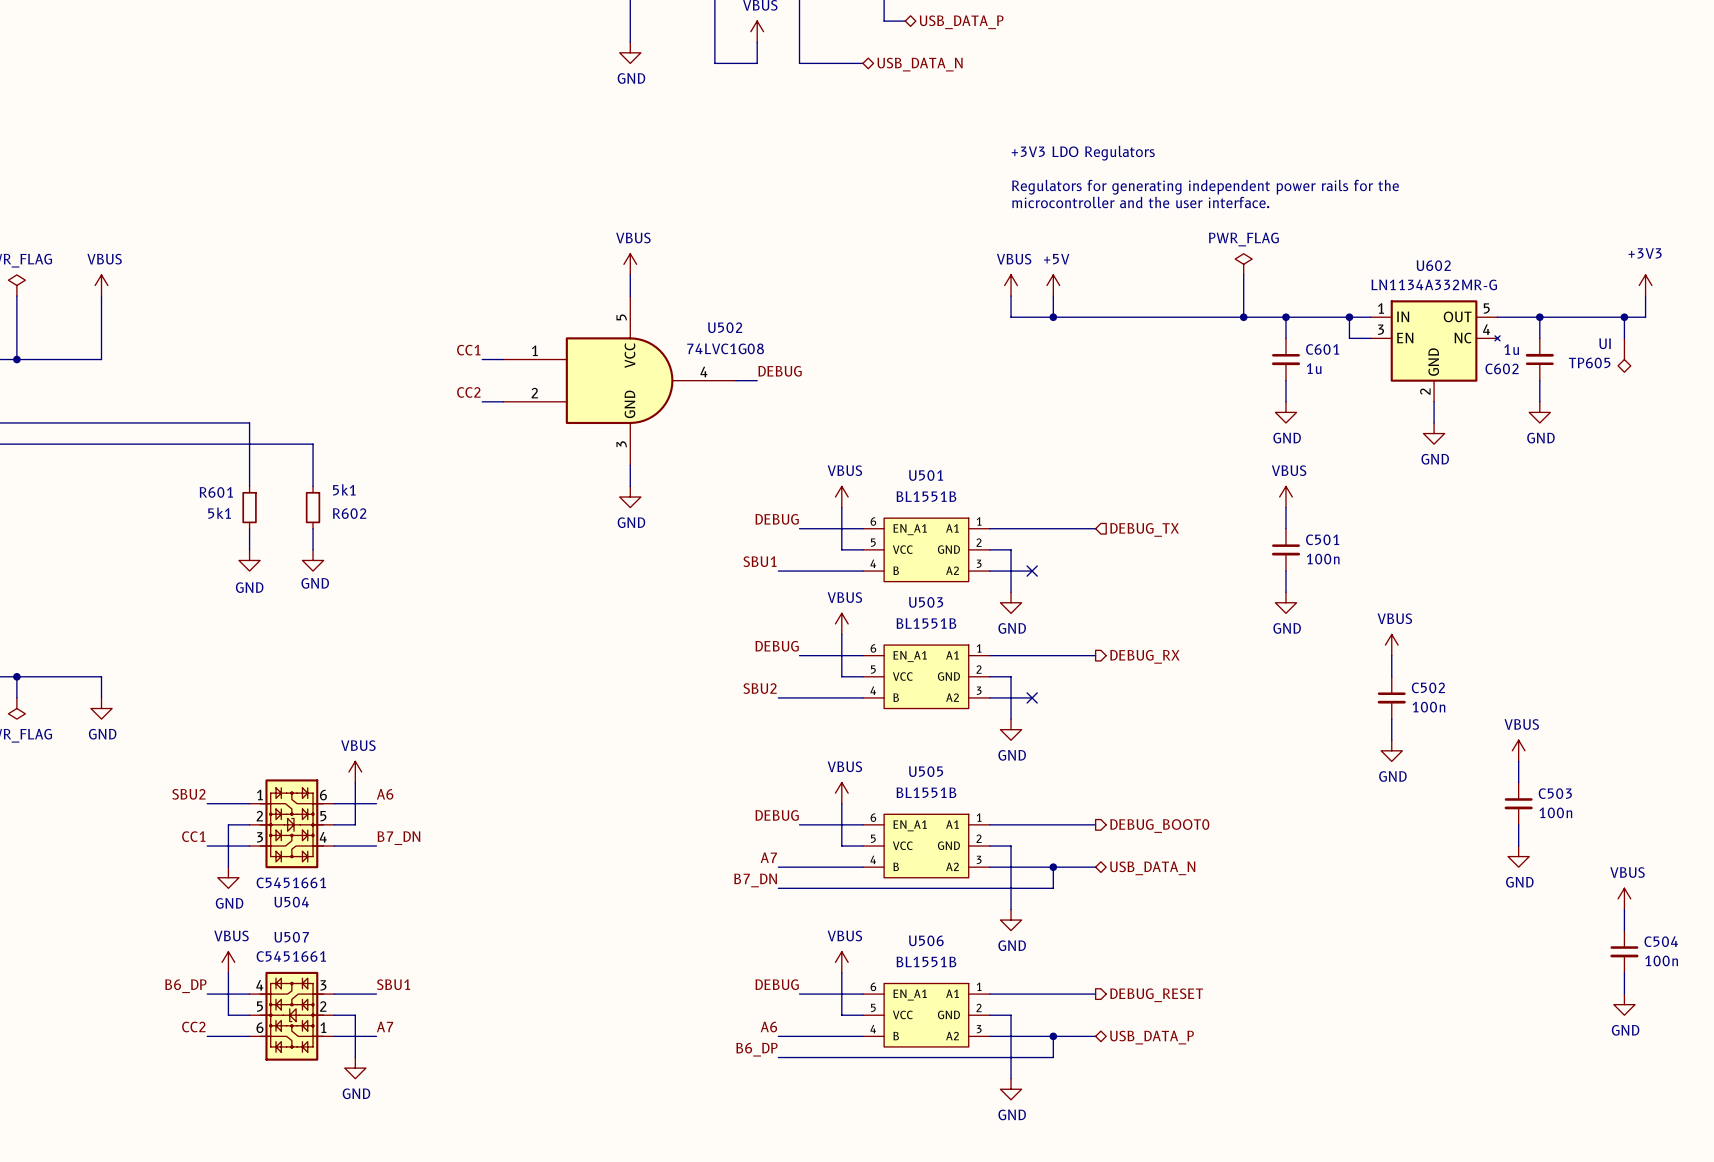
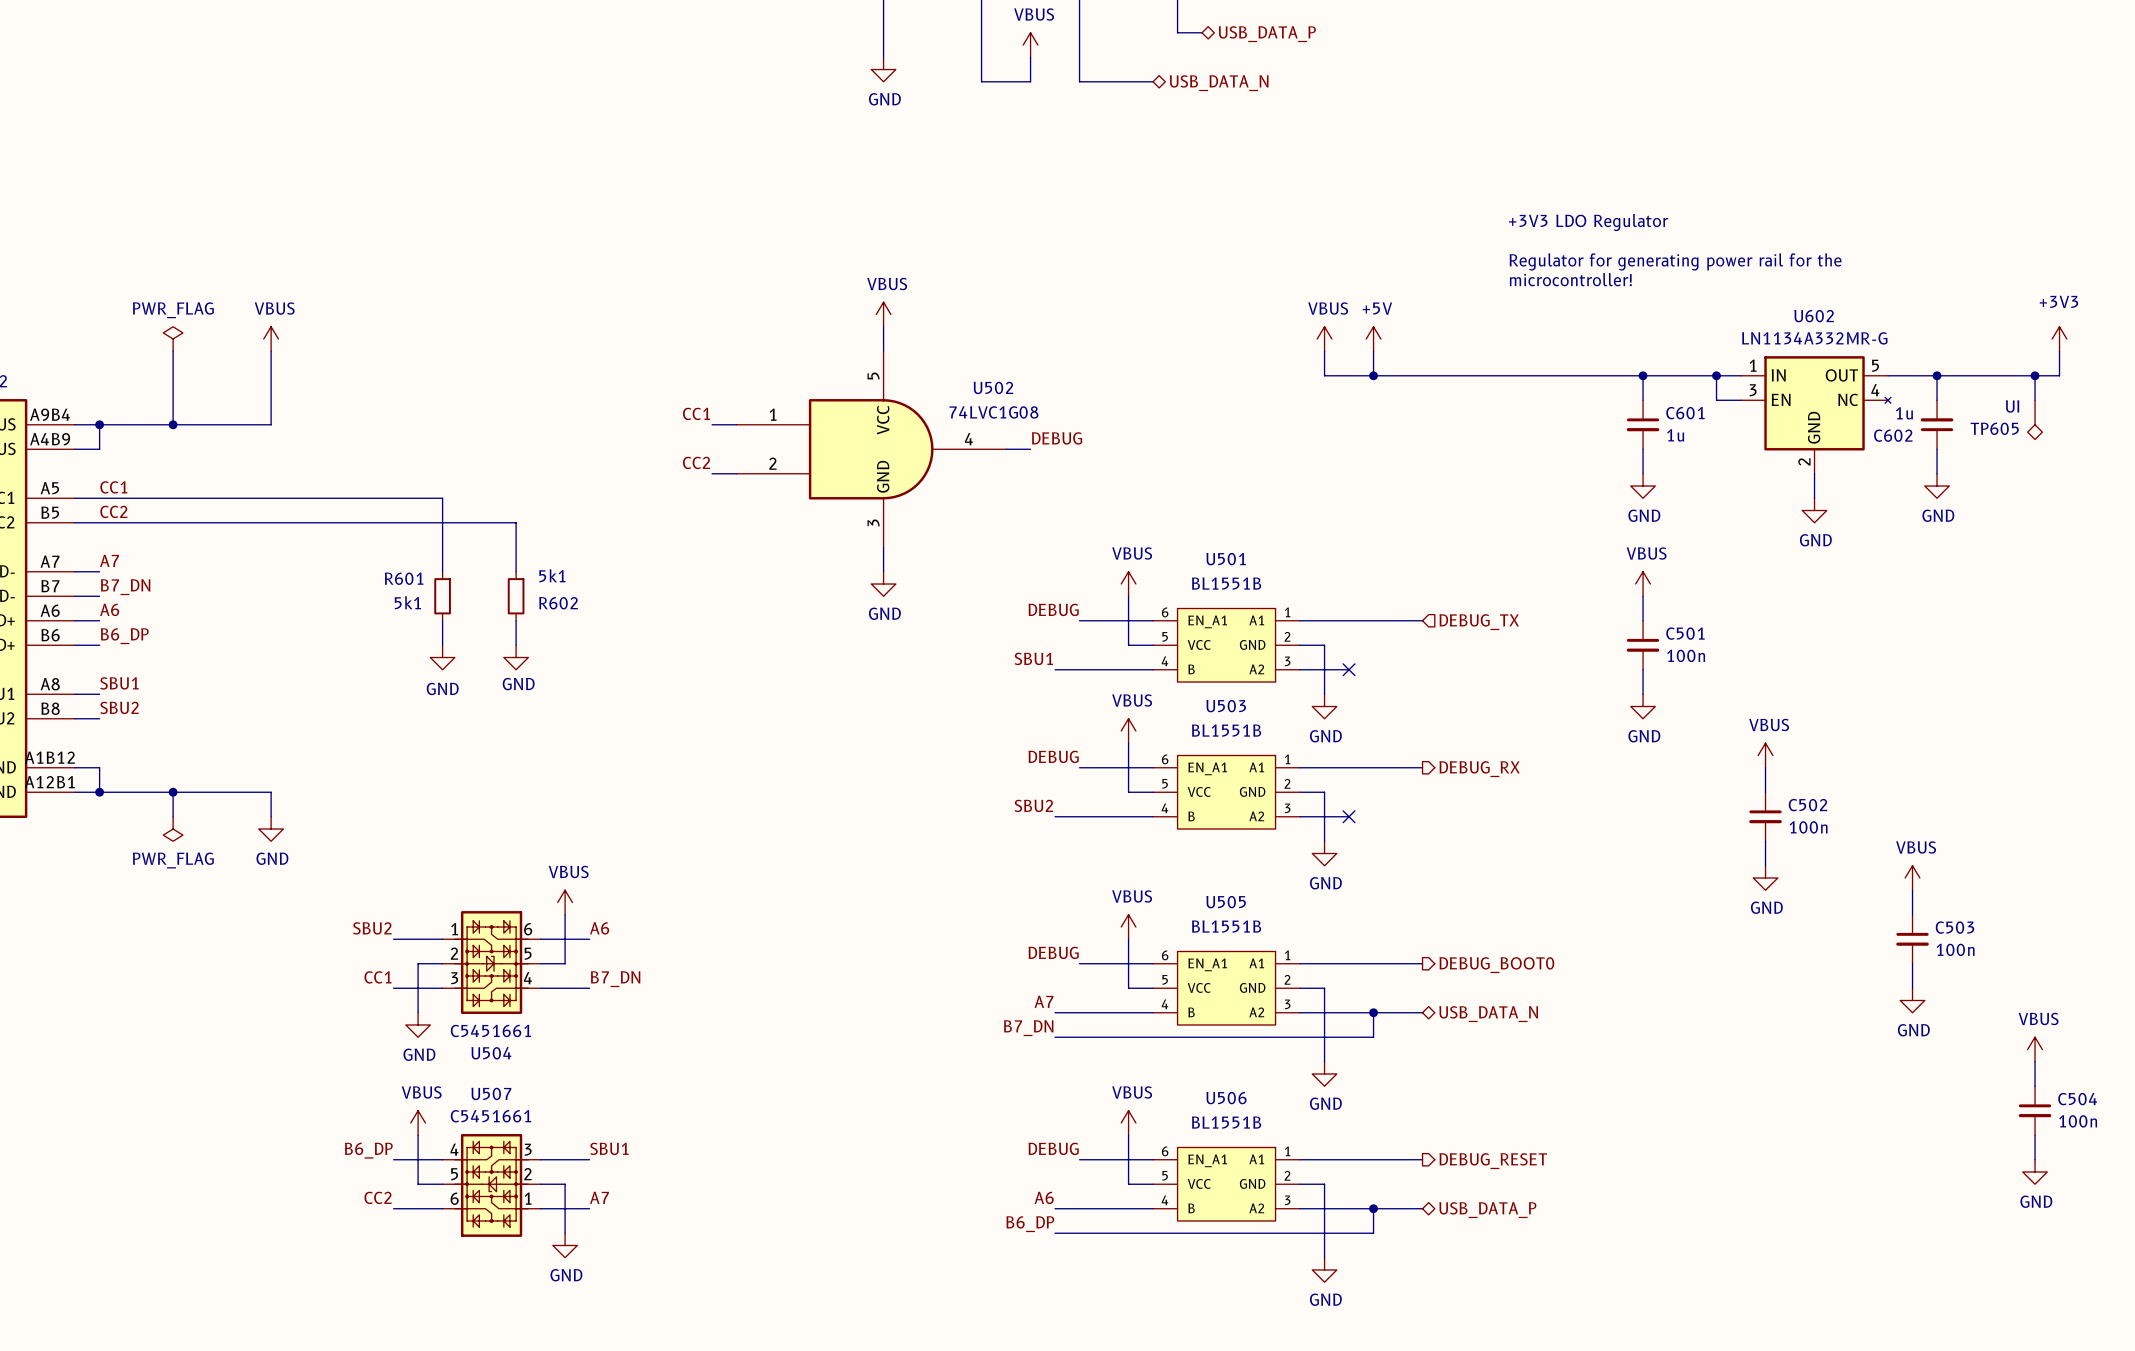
text: +3V3 LDO Regulators (1083, 153) -> none
text: none -> +3V3 LDO Regulator (1588, 222)
text: Regulators for generating independent power rails for the (1205, 187) -> none
text: microcontroller and the user interface. (1140, 202) -> none
text: none -> Regulator for generating power rail for the (1675, 261)
text: none -> microcontroller! (1570, 279)
power symbol: PWR_FLAG (1243, 264) -> none
wire: (1243, 274) (1243, 317) -> none
junction: (1243, 317) -> none

